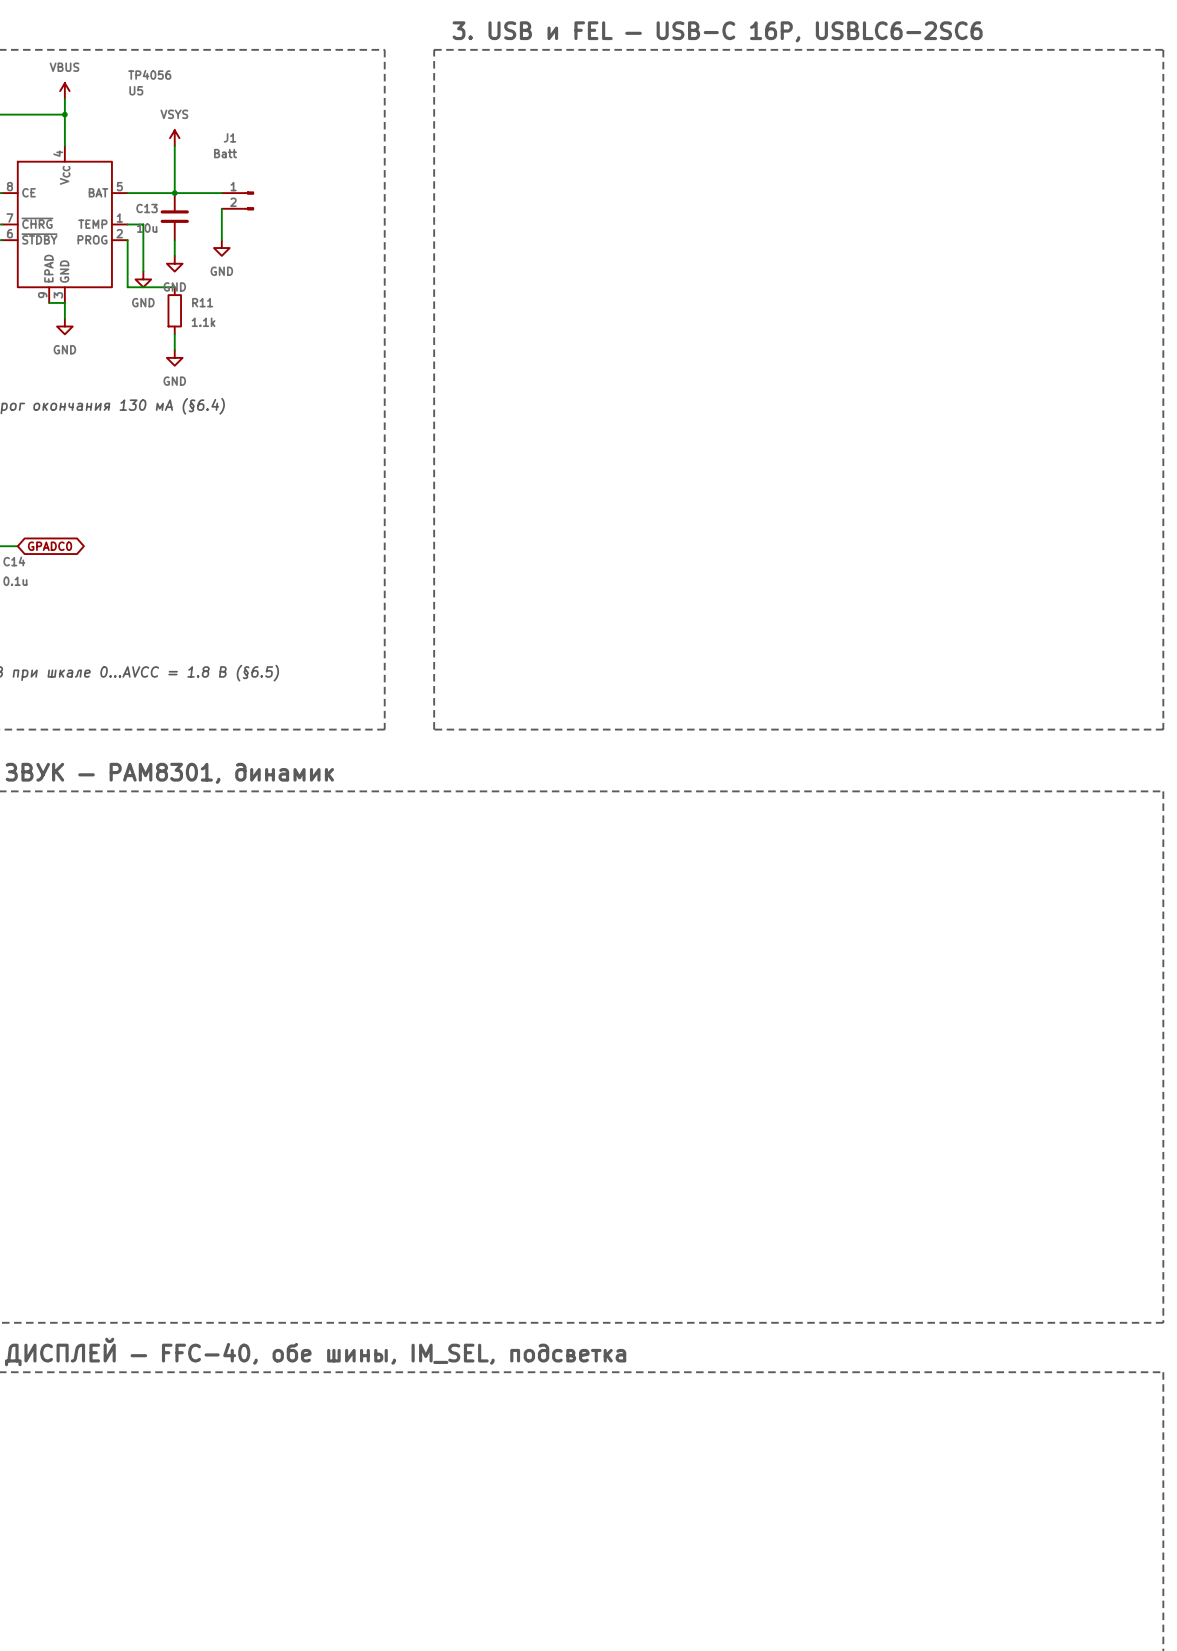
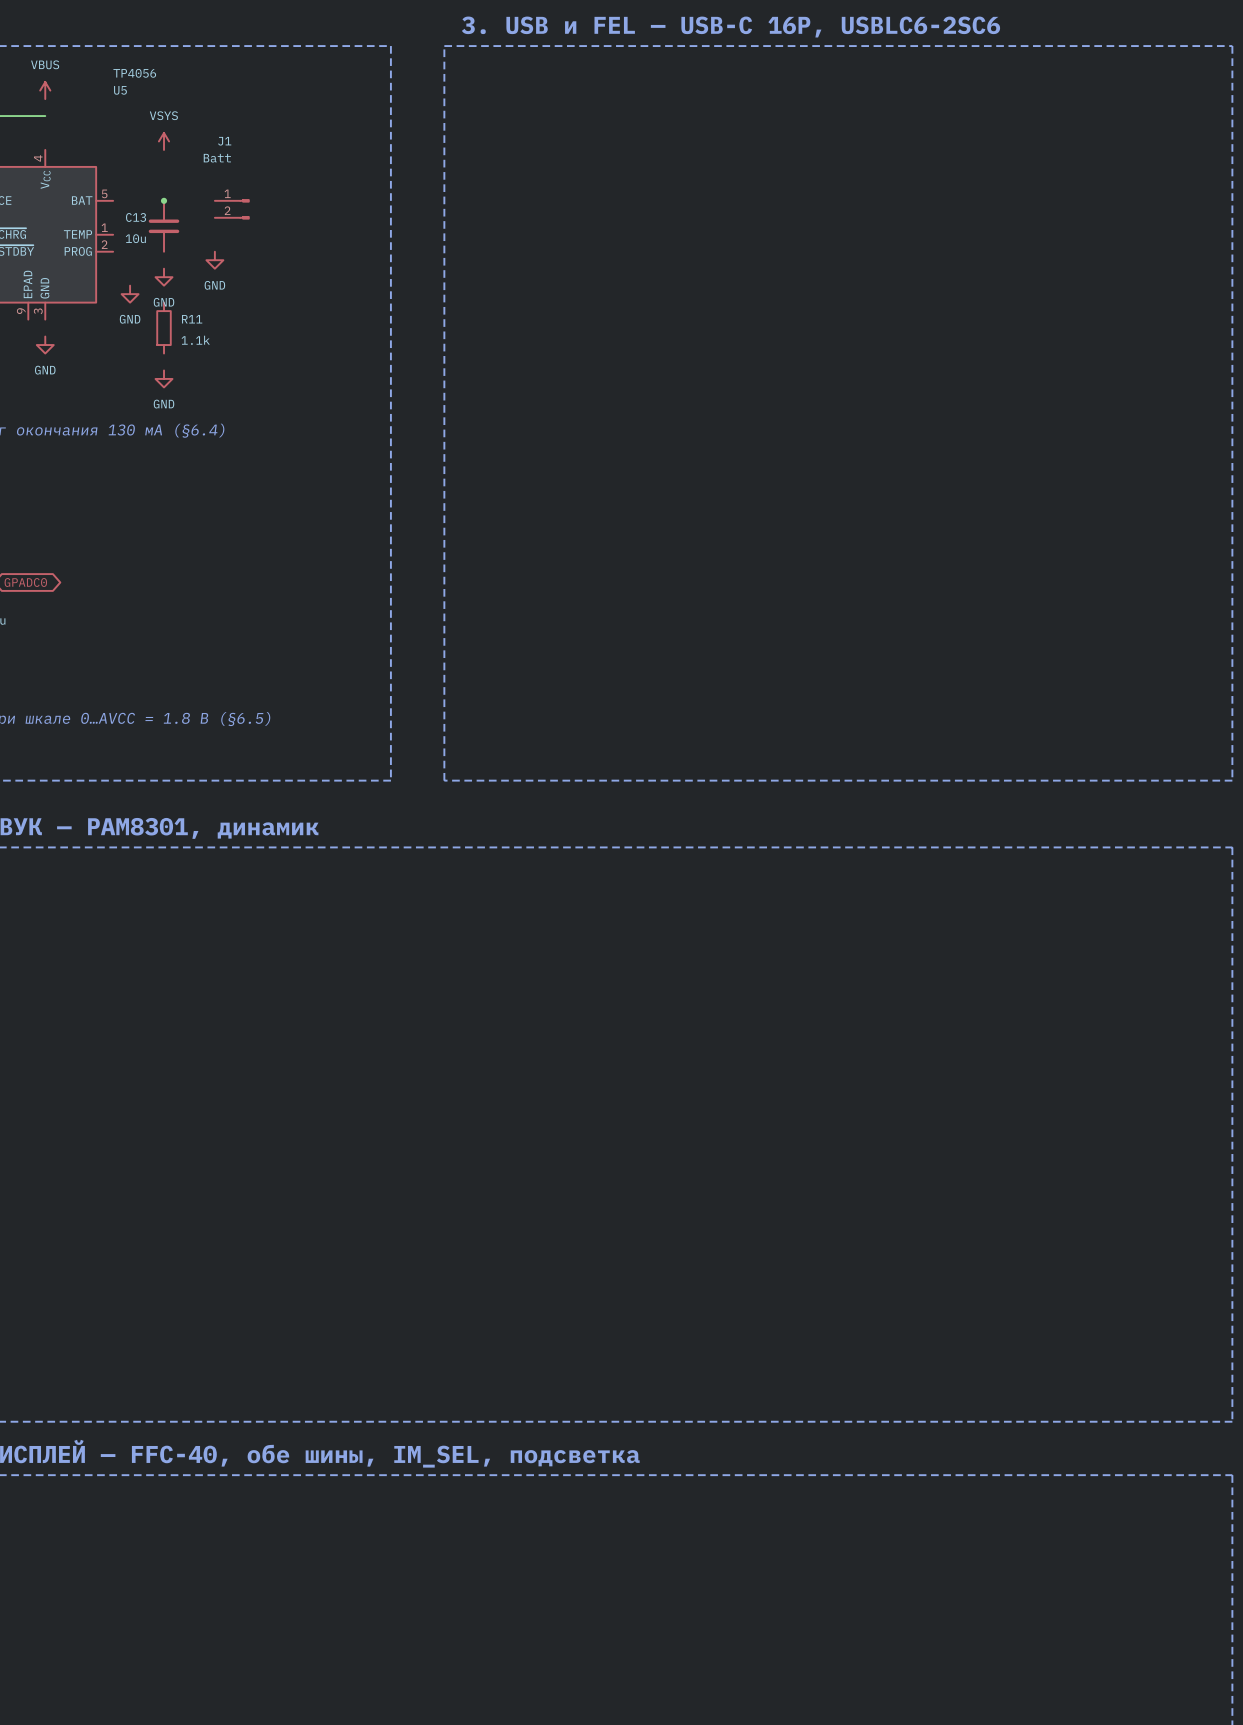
wire: (64, 98) (64, 146) -> none
junction: (64, 114) -> none
wire: (174, 146) (174, 193) -> none
wire: (127, 193) (221, 193) -> none
wire: (221, 208) (221, 240) -> none
wire: (127, 224) (143, 224) (143, 271) -> none
wire: (127, 240) (127, 287) (174, 287) -> none
wire: (174, 240) (174, 255) -> none
wire: (49, 302) (64, 302) (64, 318) -> none
wire: (174, 334) (174, 350) -> none

